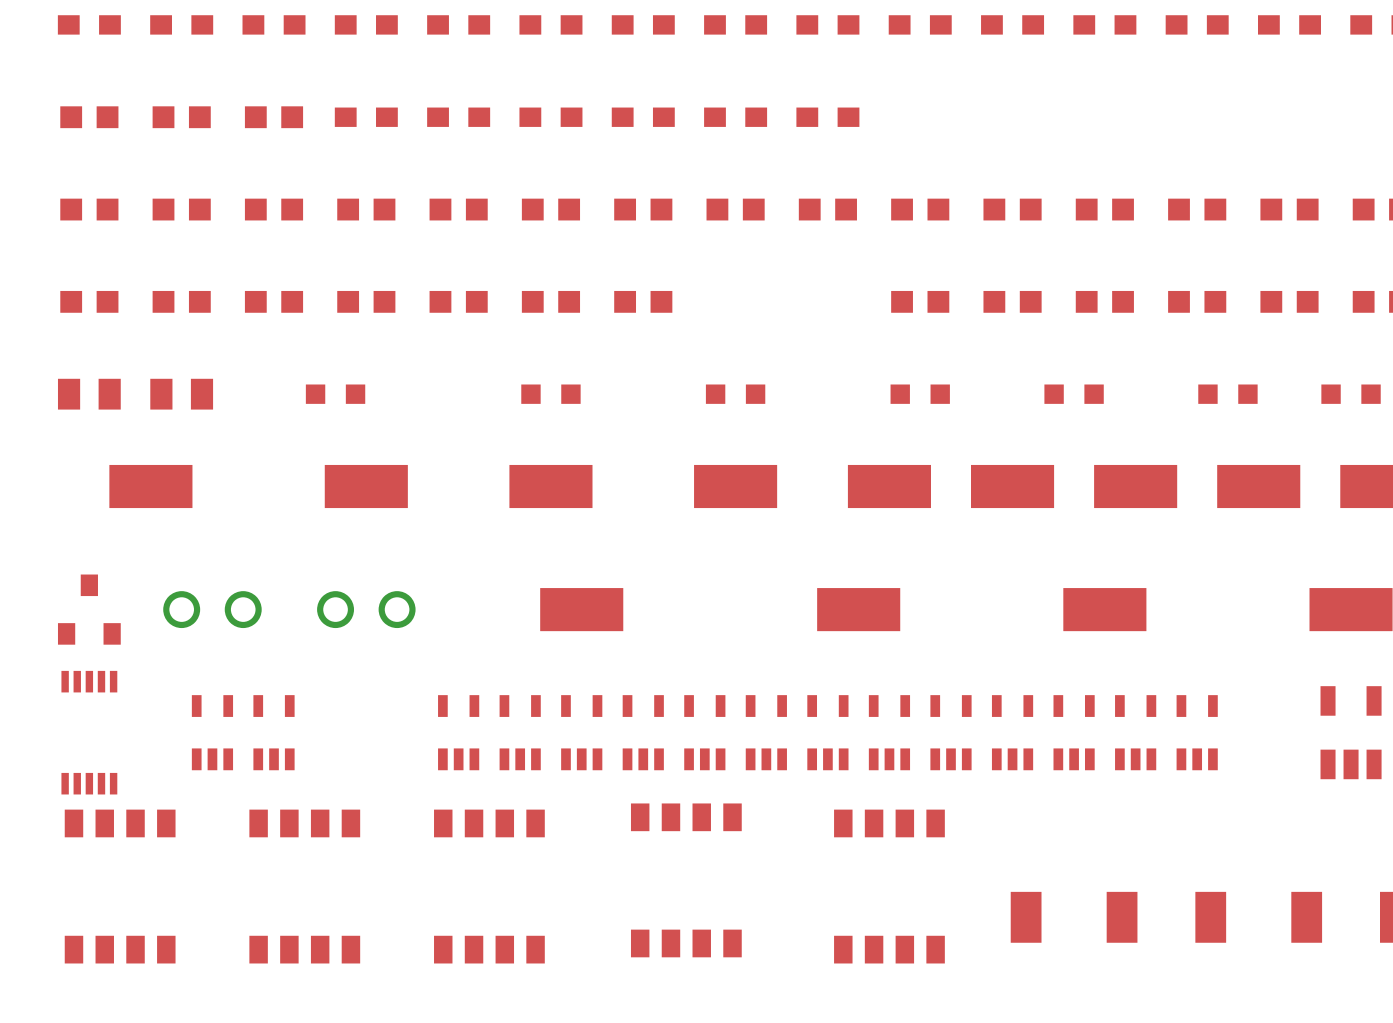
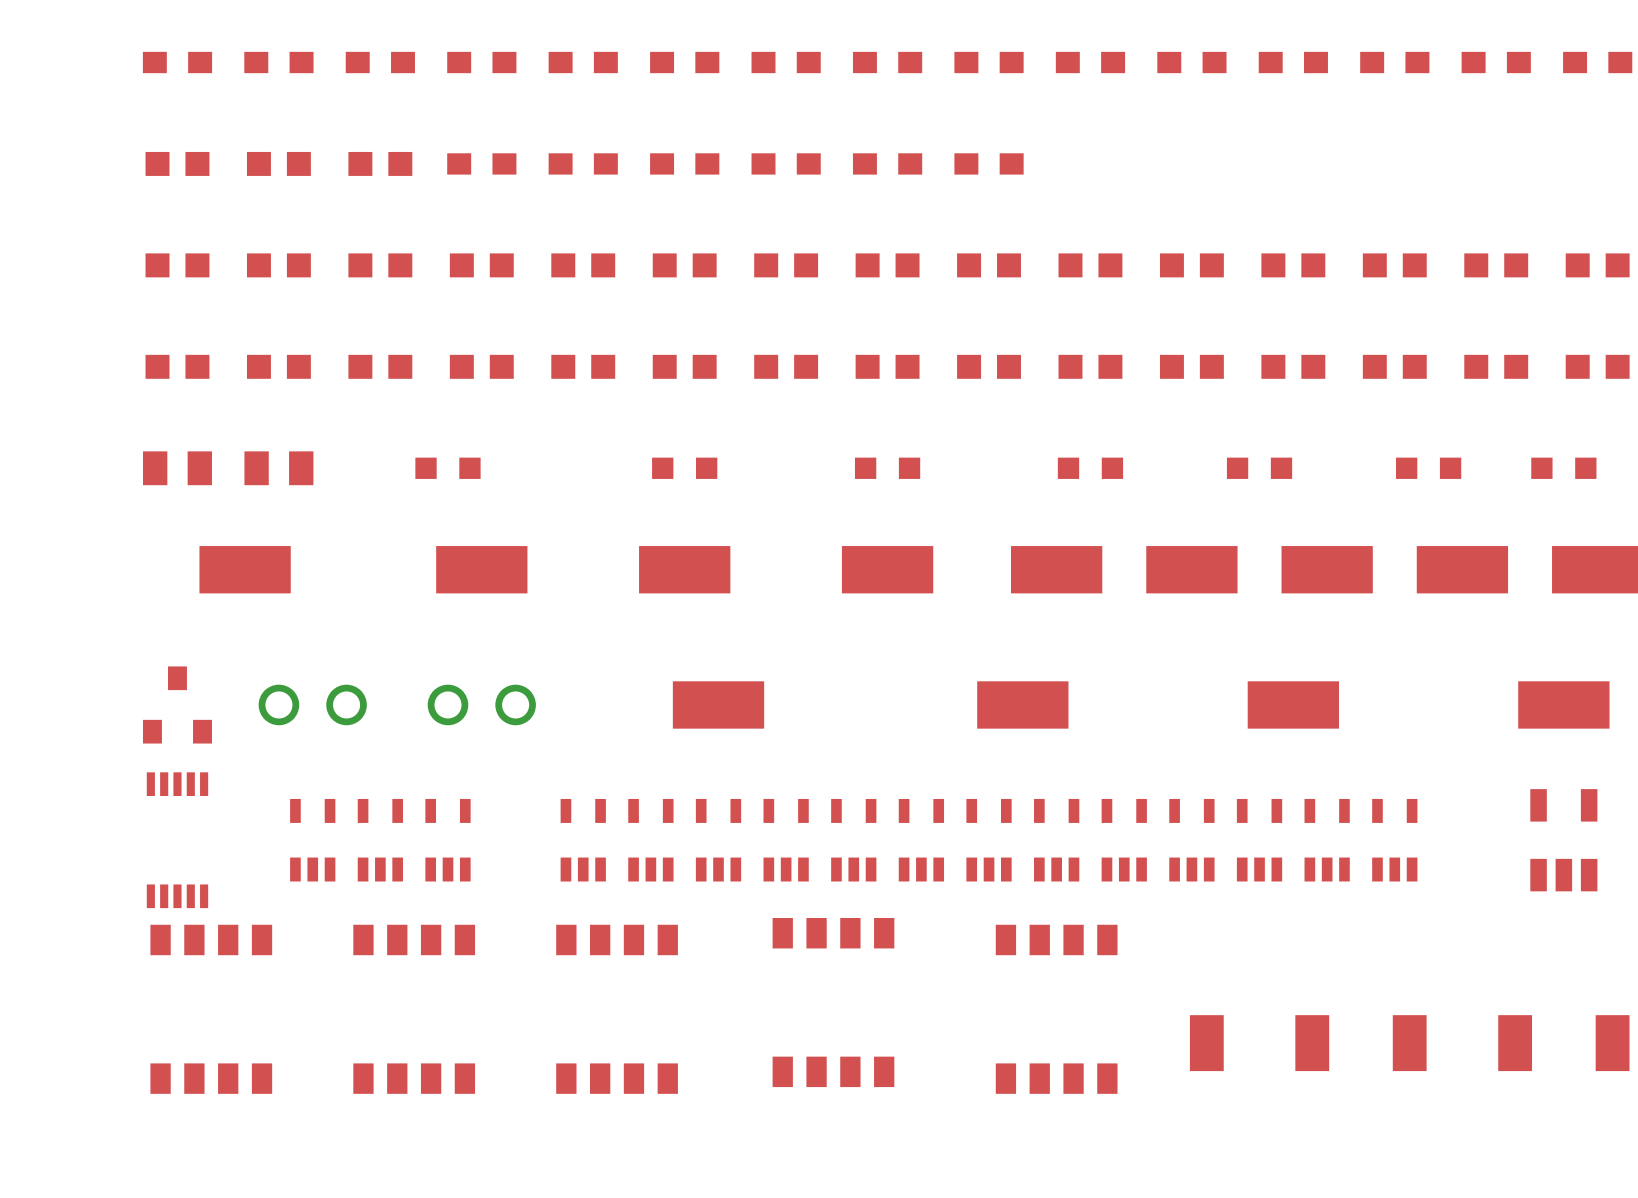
part: none -> (887, 366)
part: none -> (989, 366)
part: none -> (447, 840)

